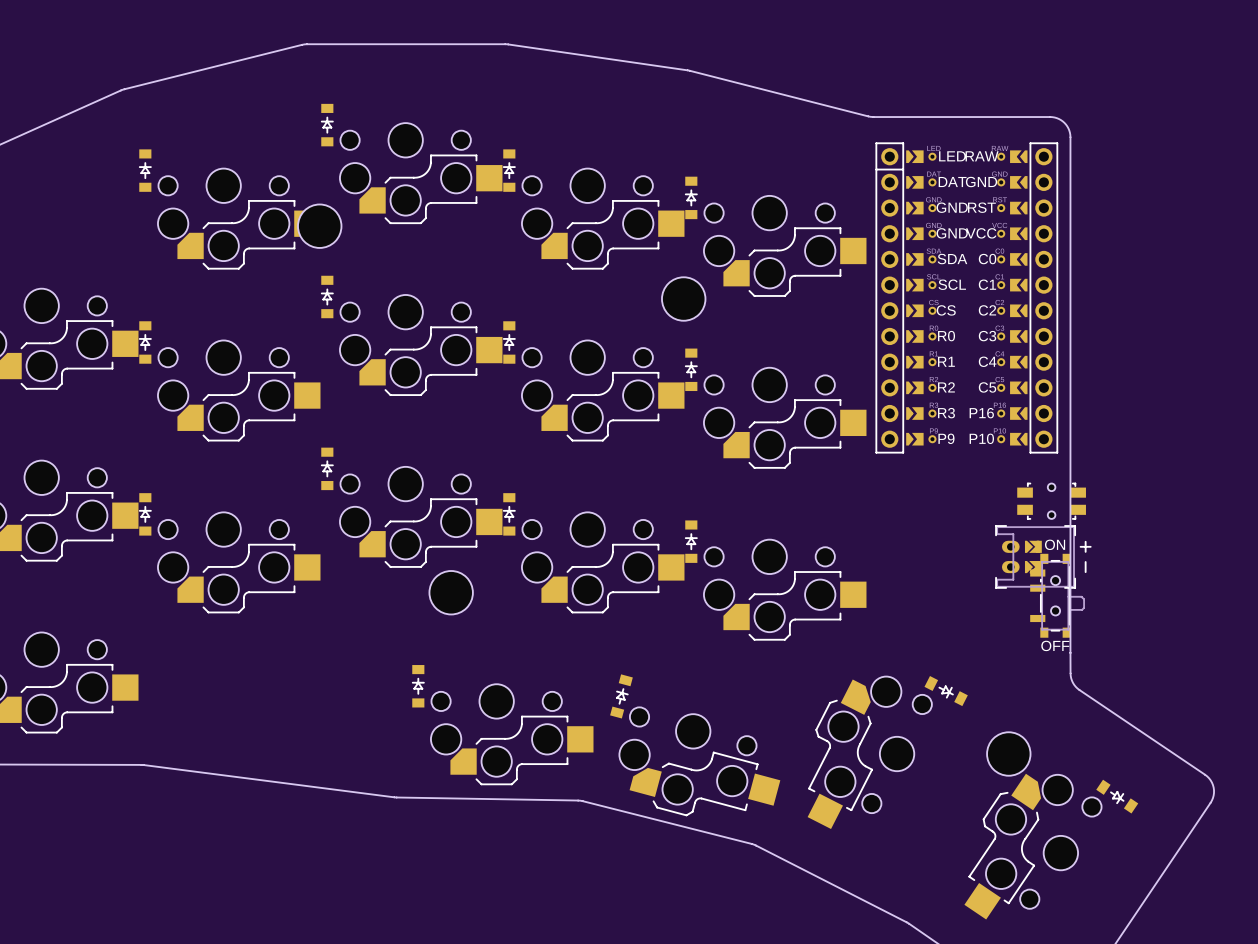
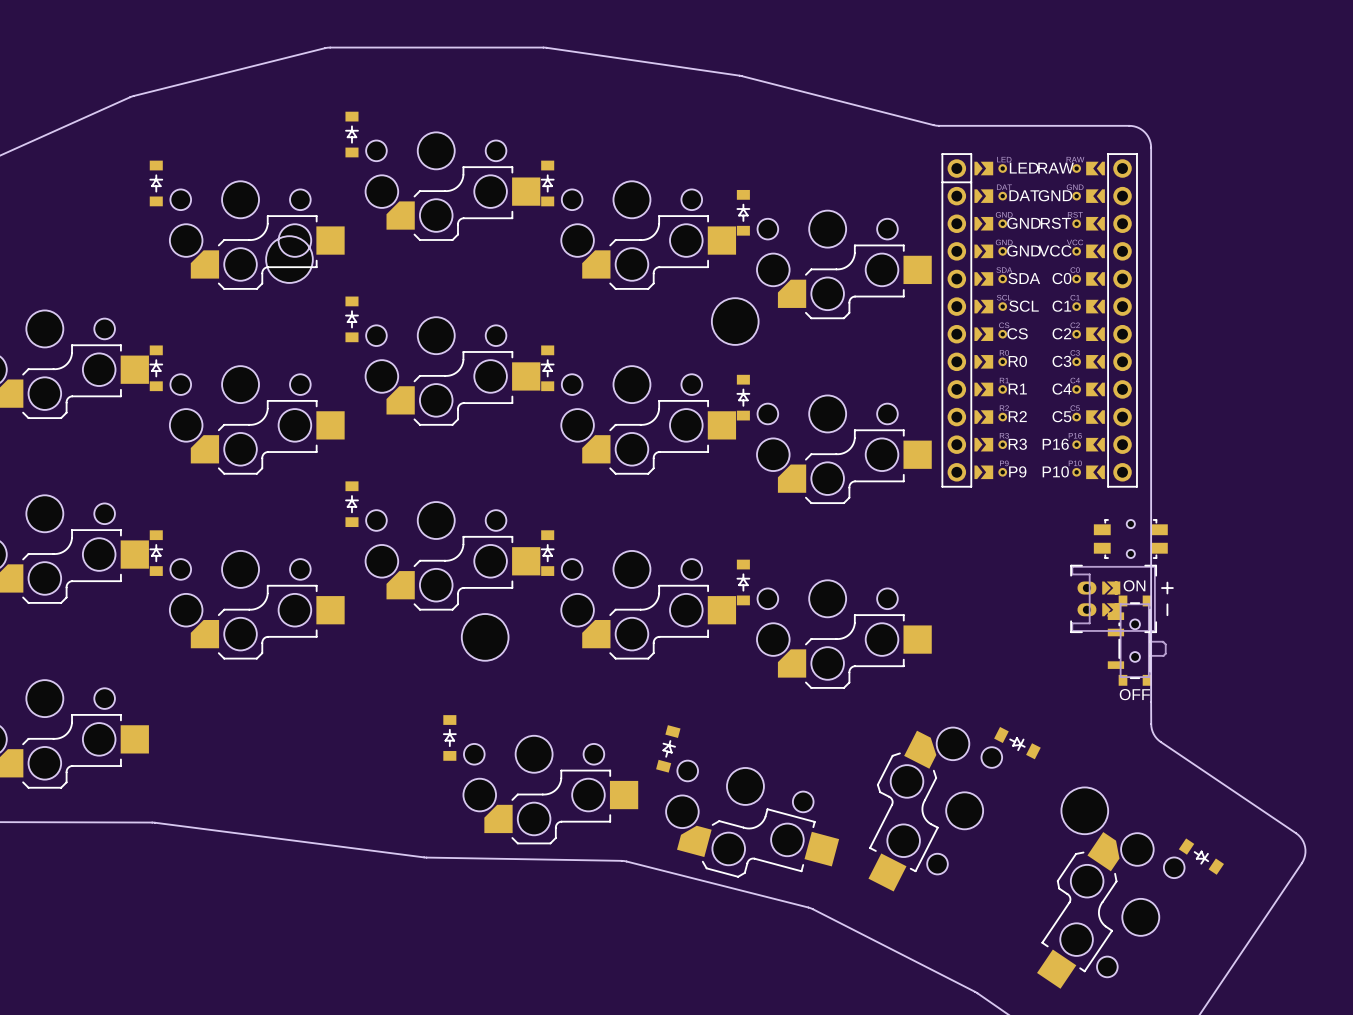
part position: (319, 226) -> (289, 259)

